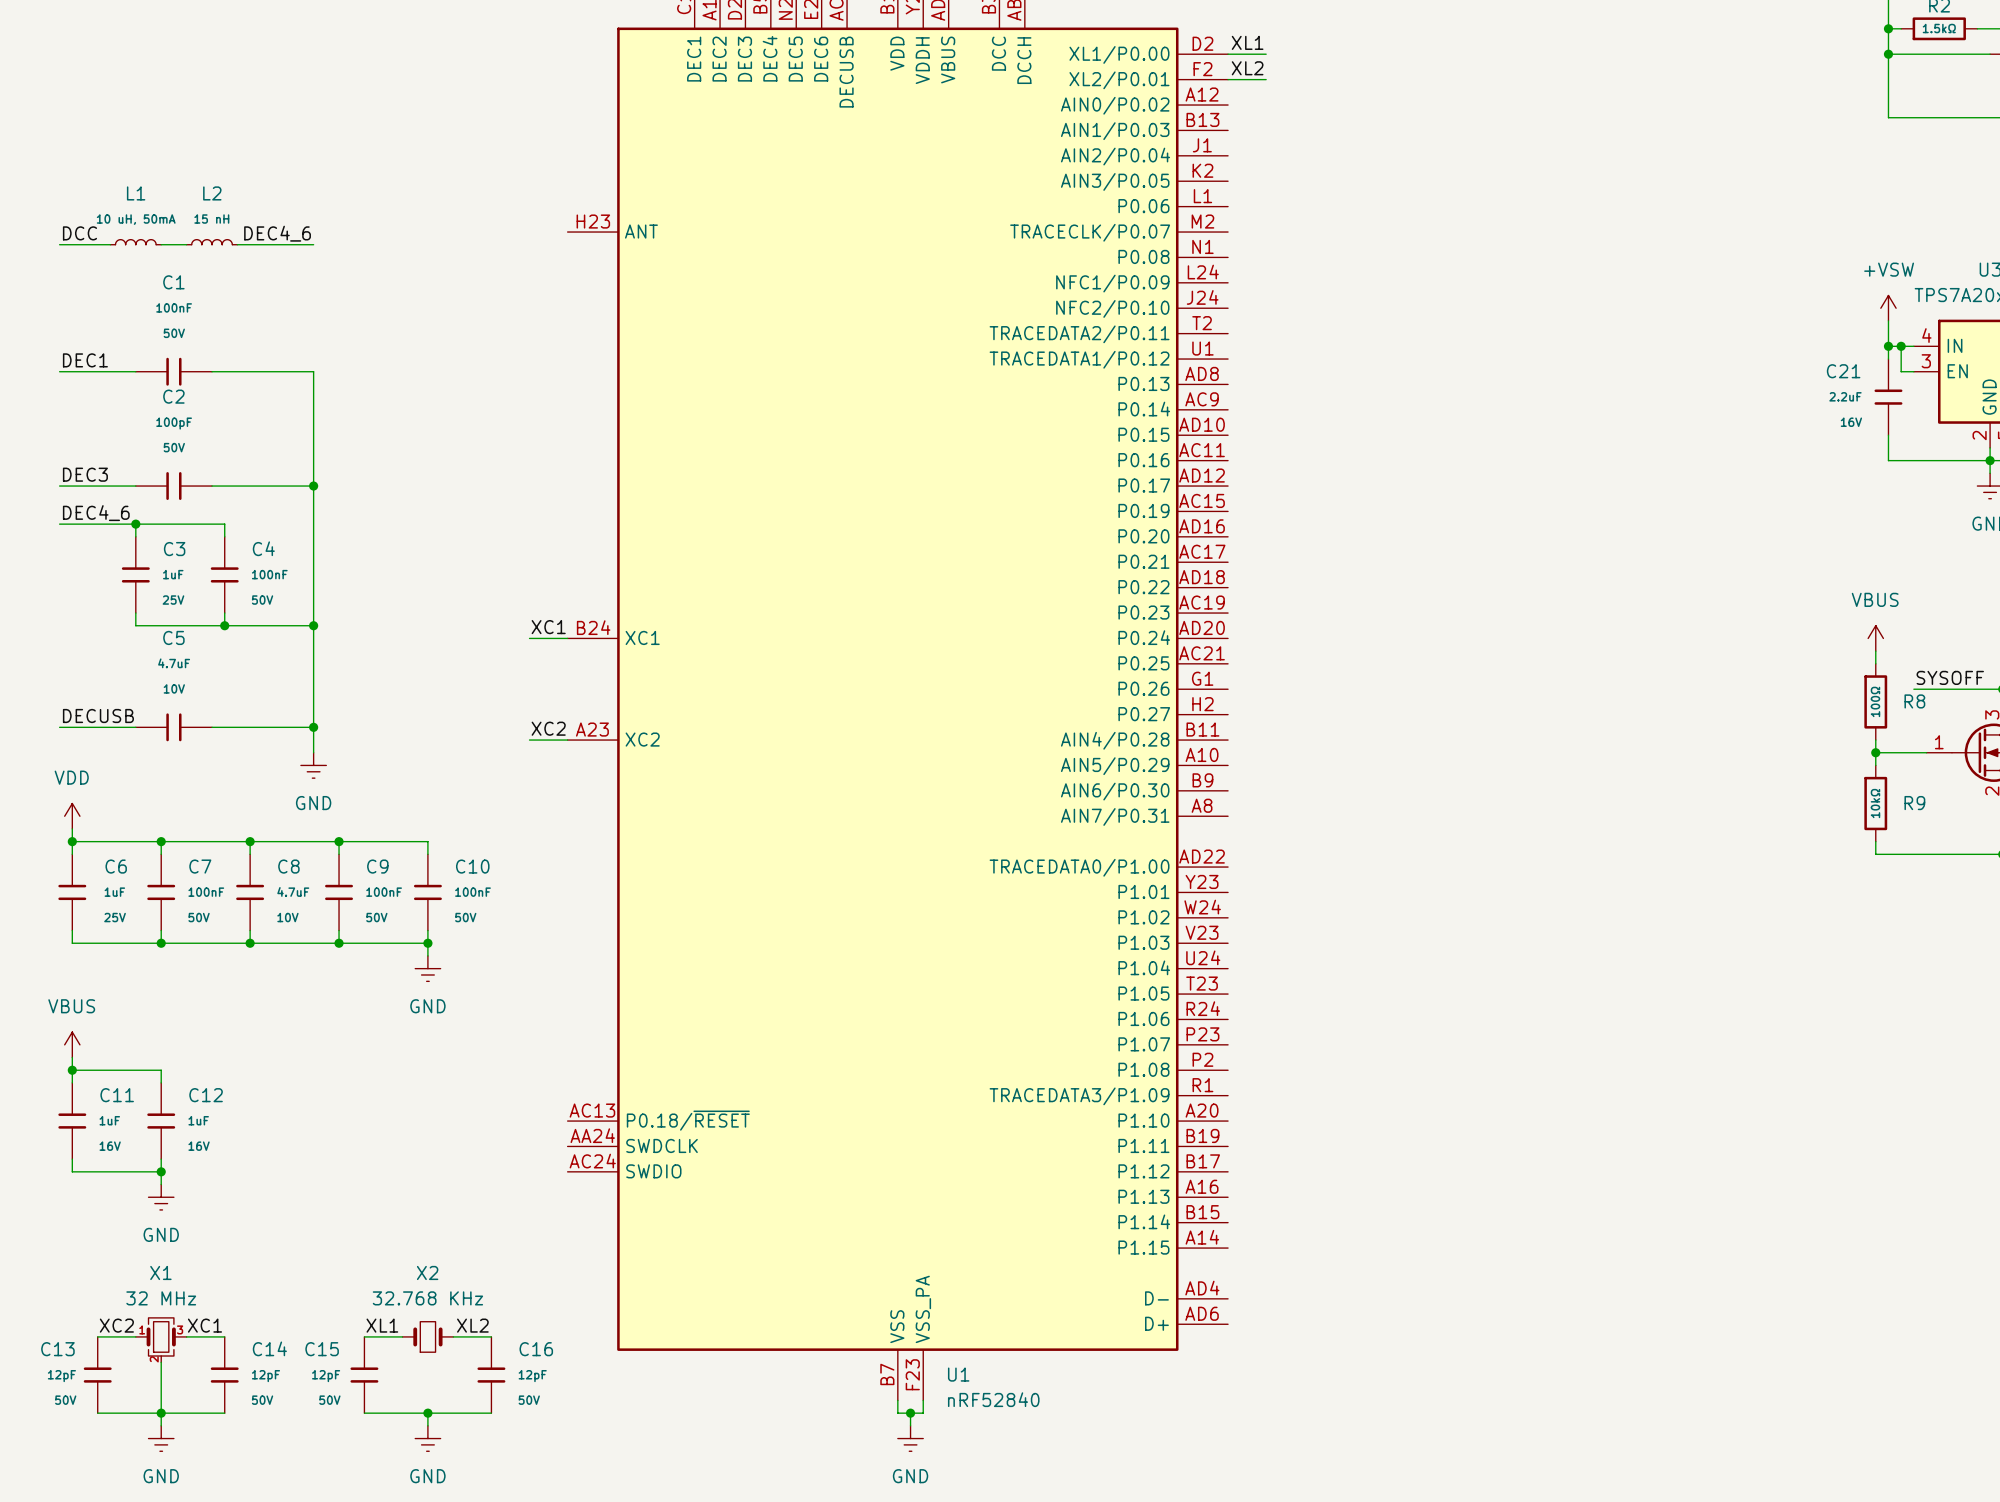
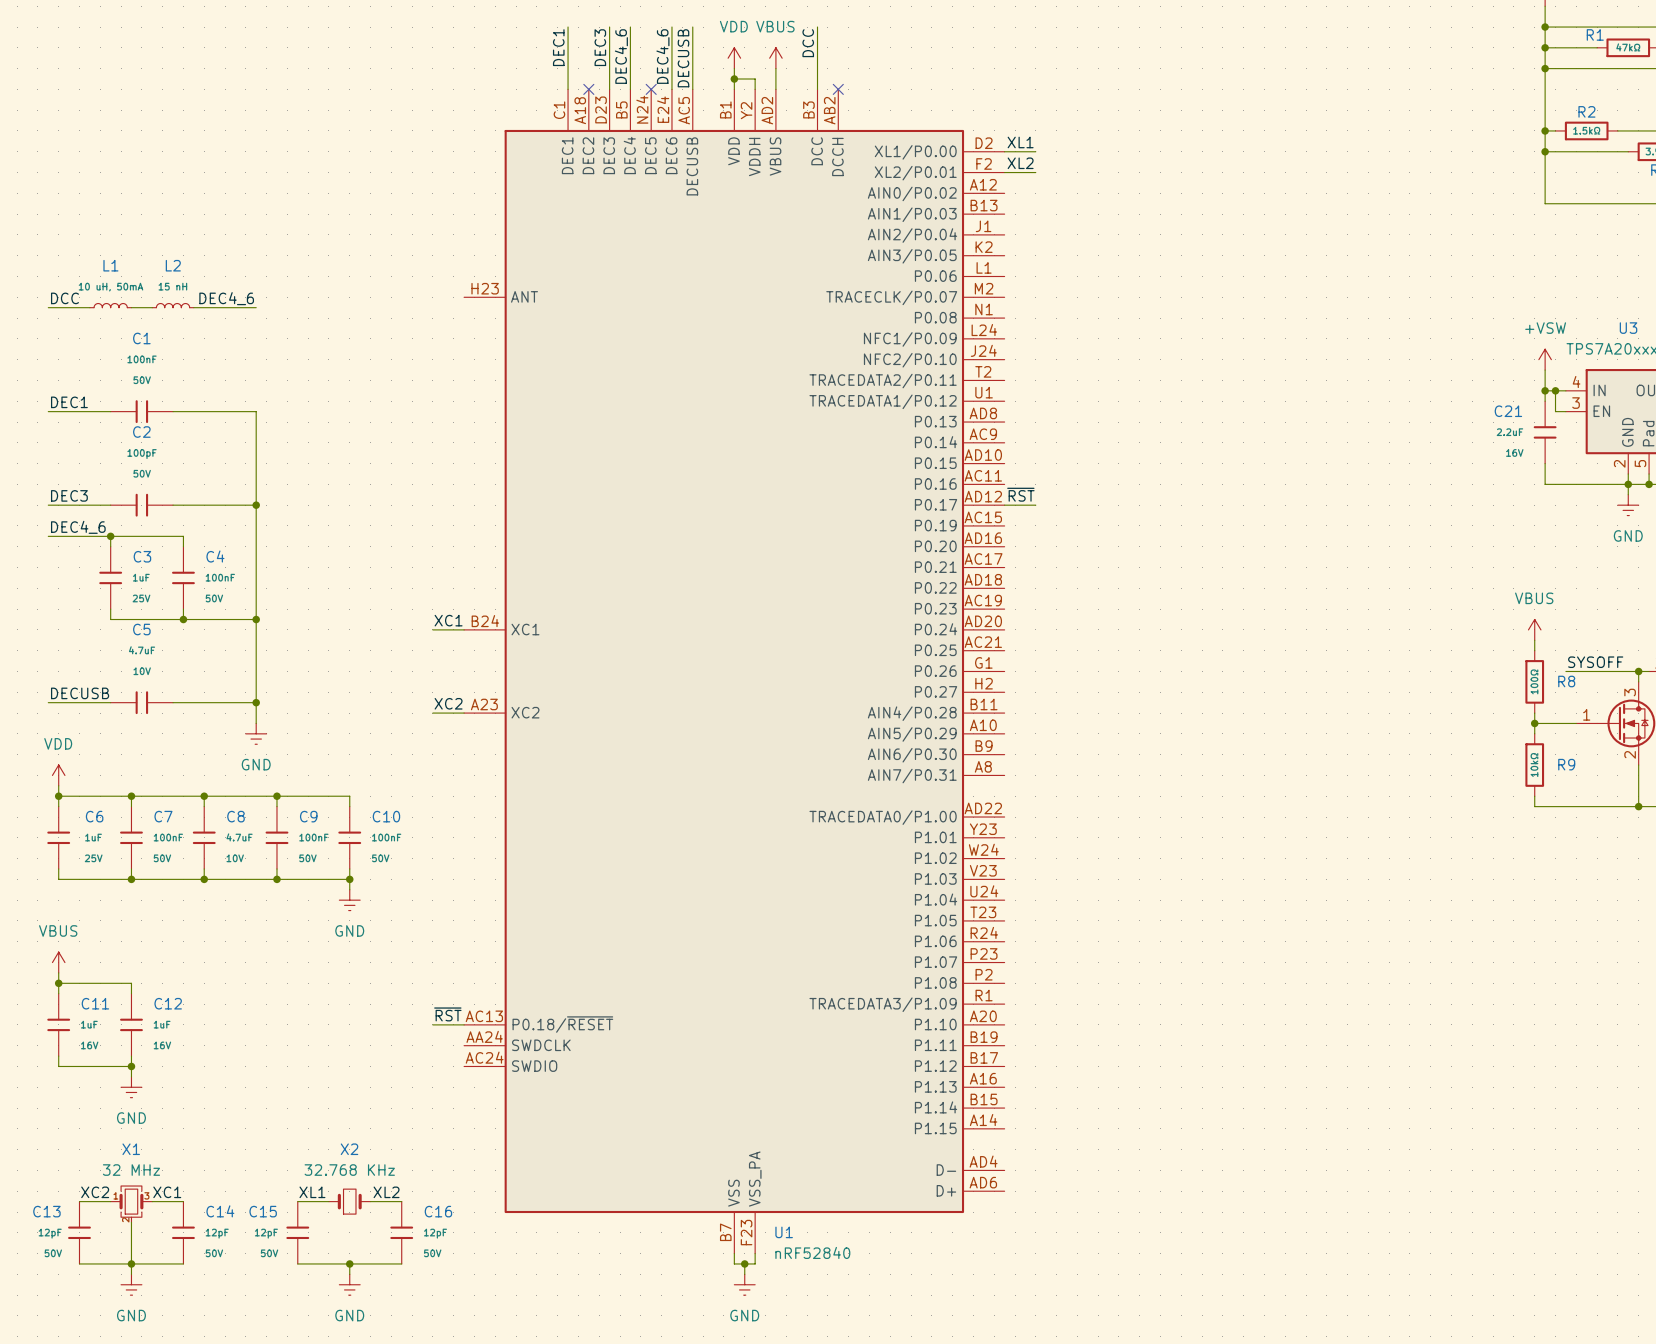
label: none -> ~{RST} (1020, 494)
wire: none -> (1004, 505) (1035, 505)
label: none -> ~{RST} (447, 1014)
wire: none -> (432, 1024) (464, 1024)

